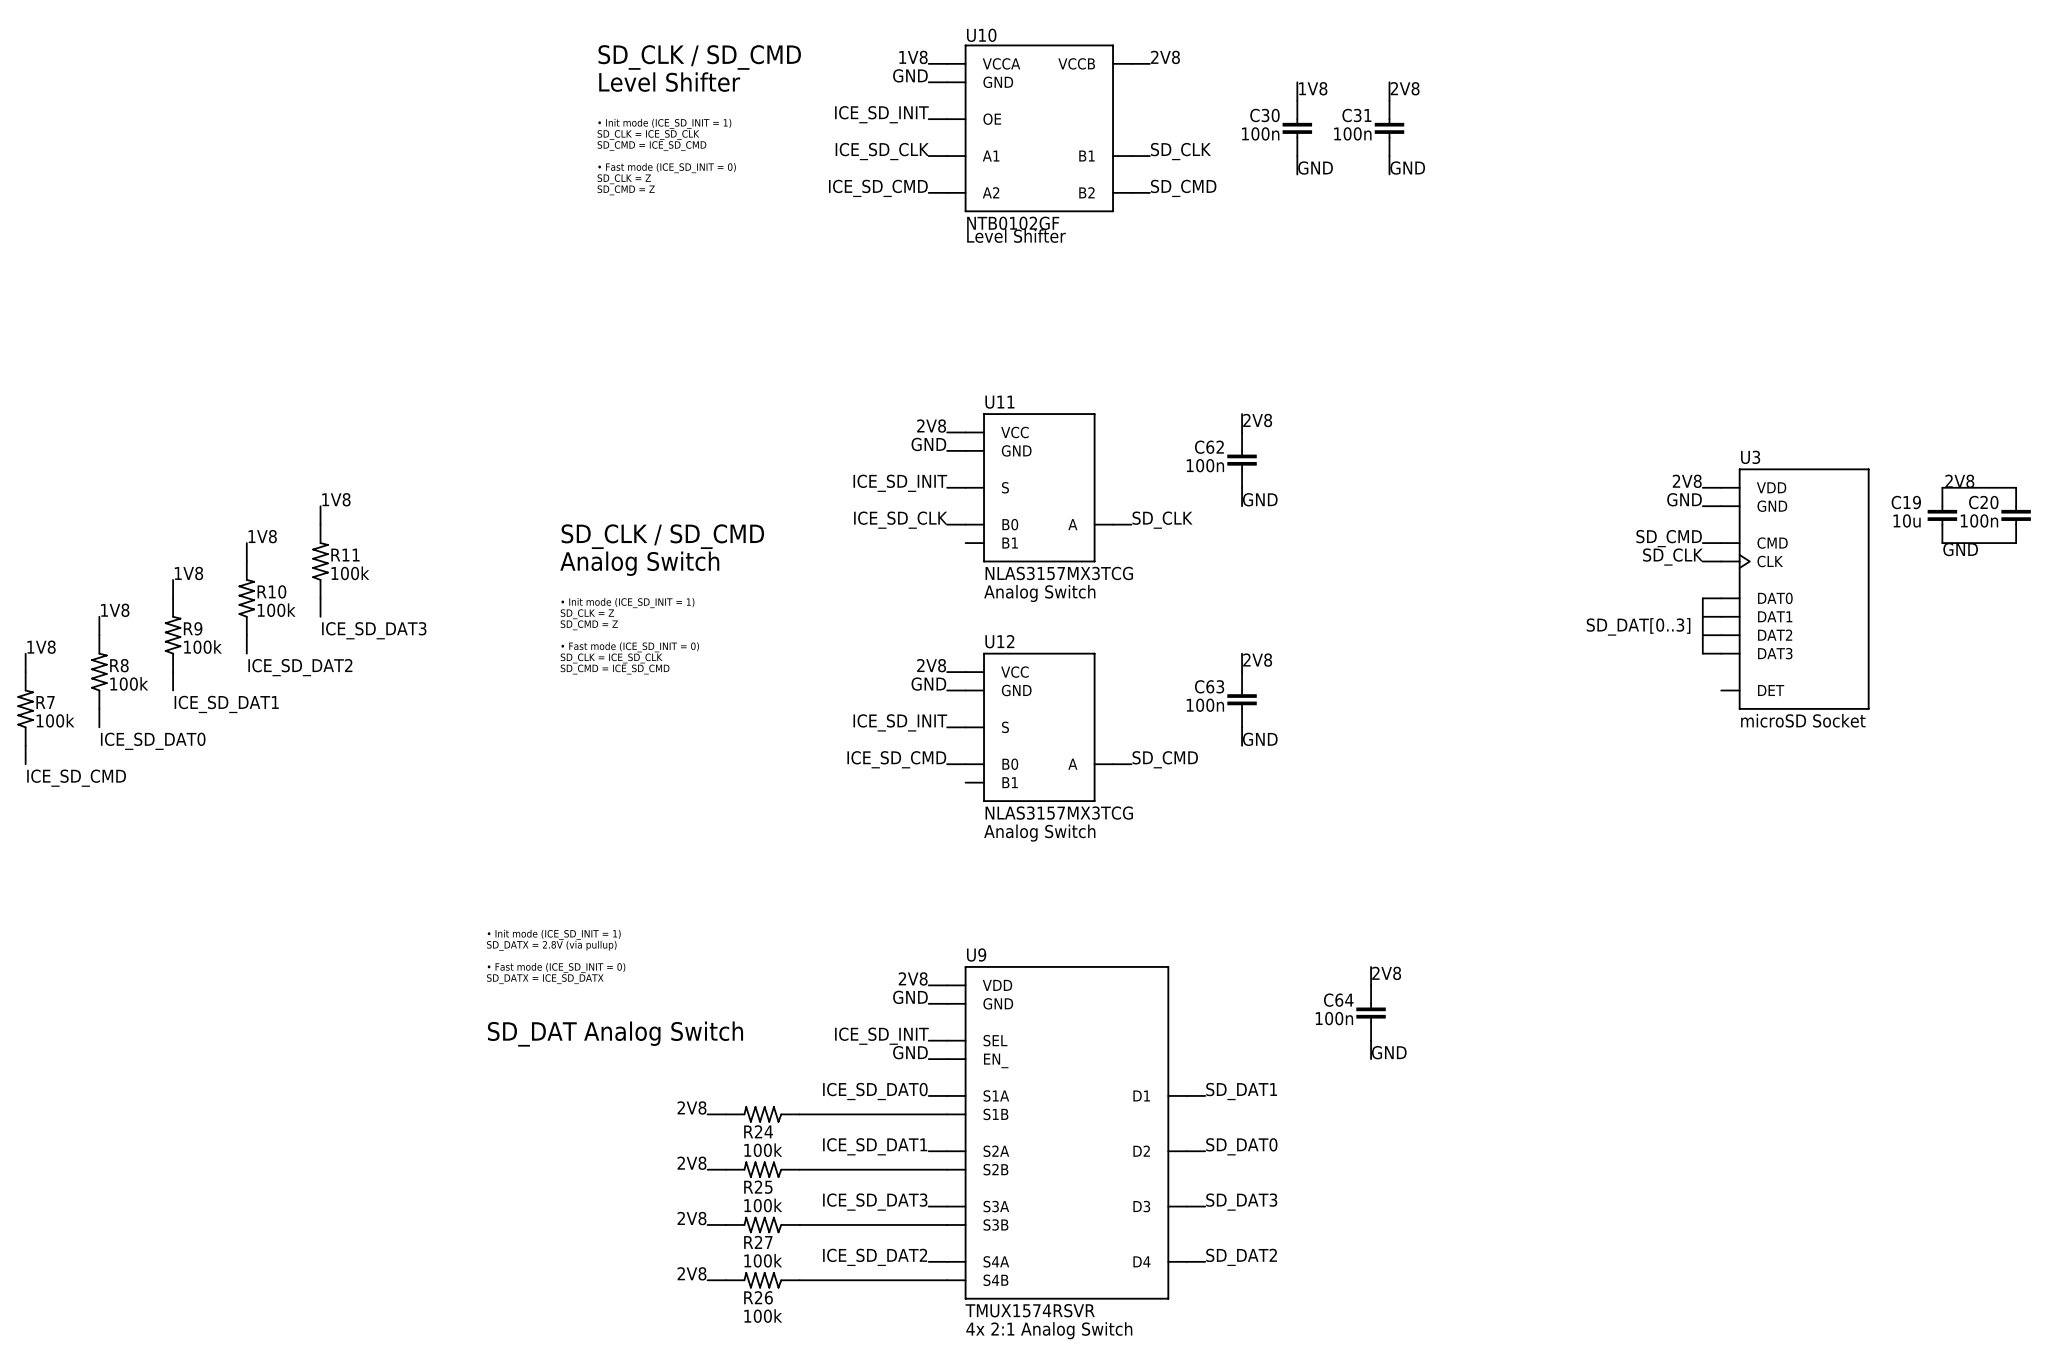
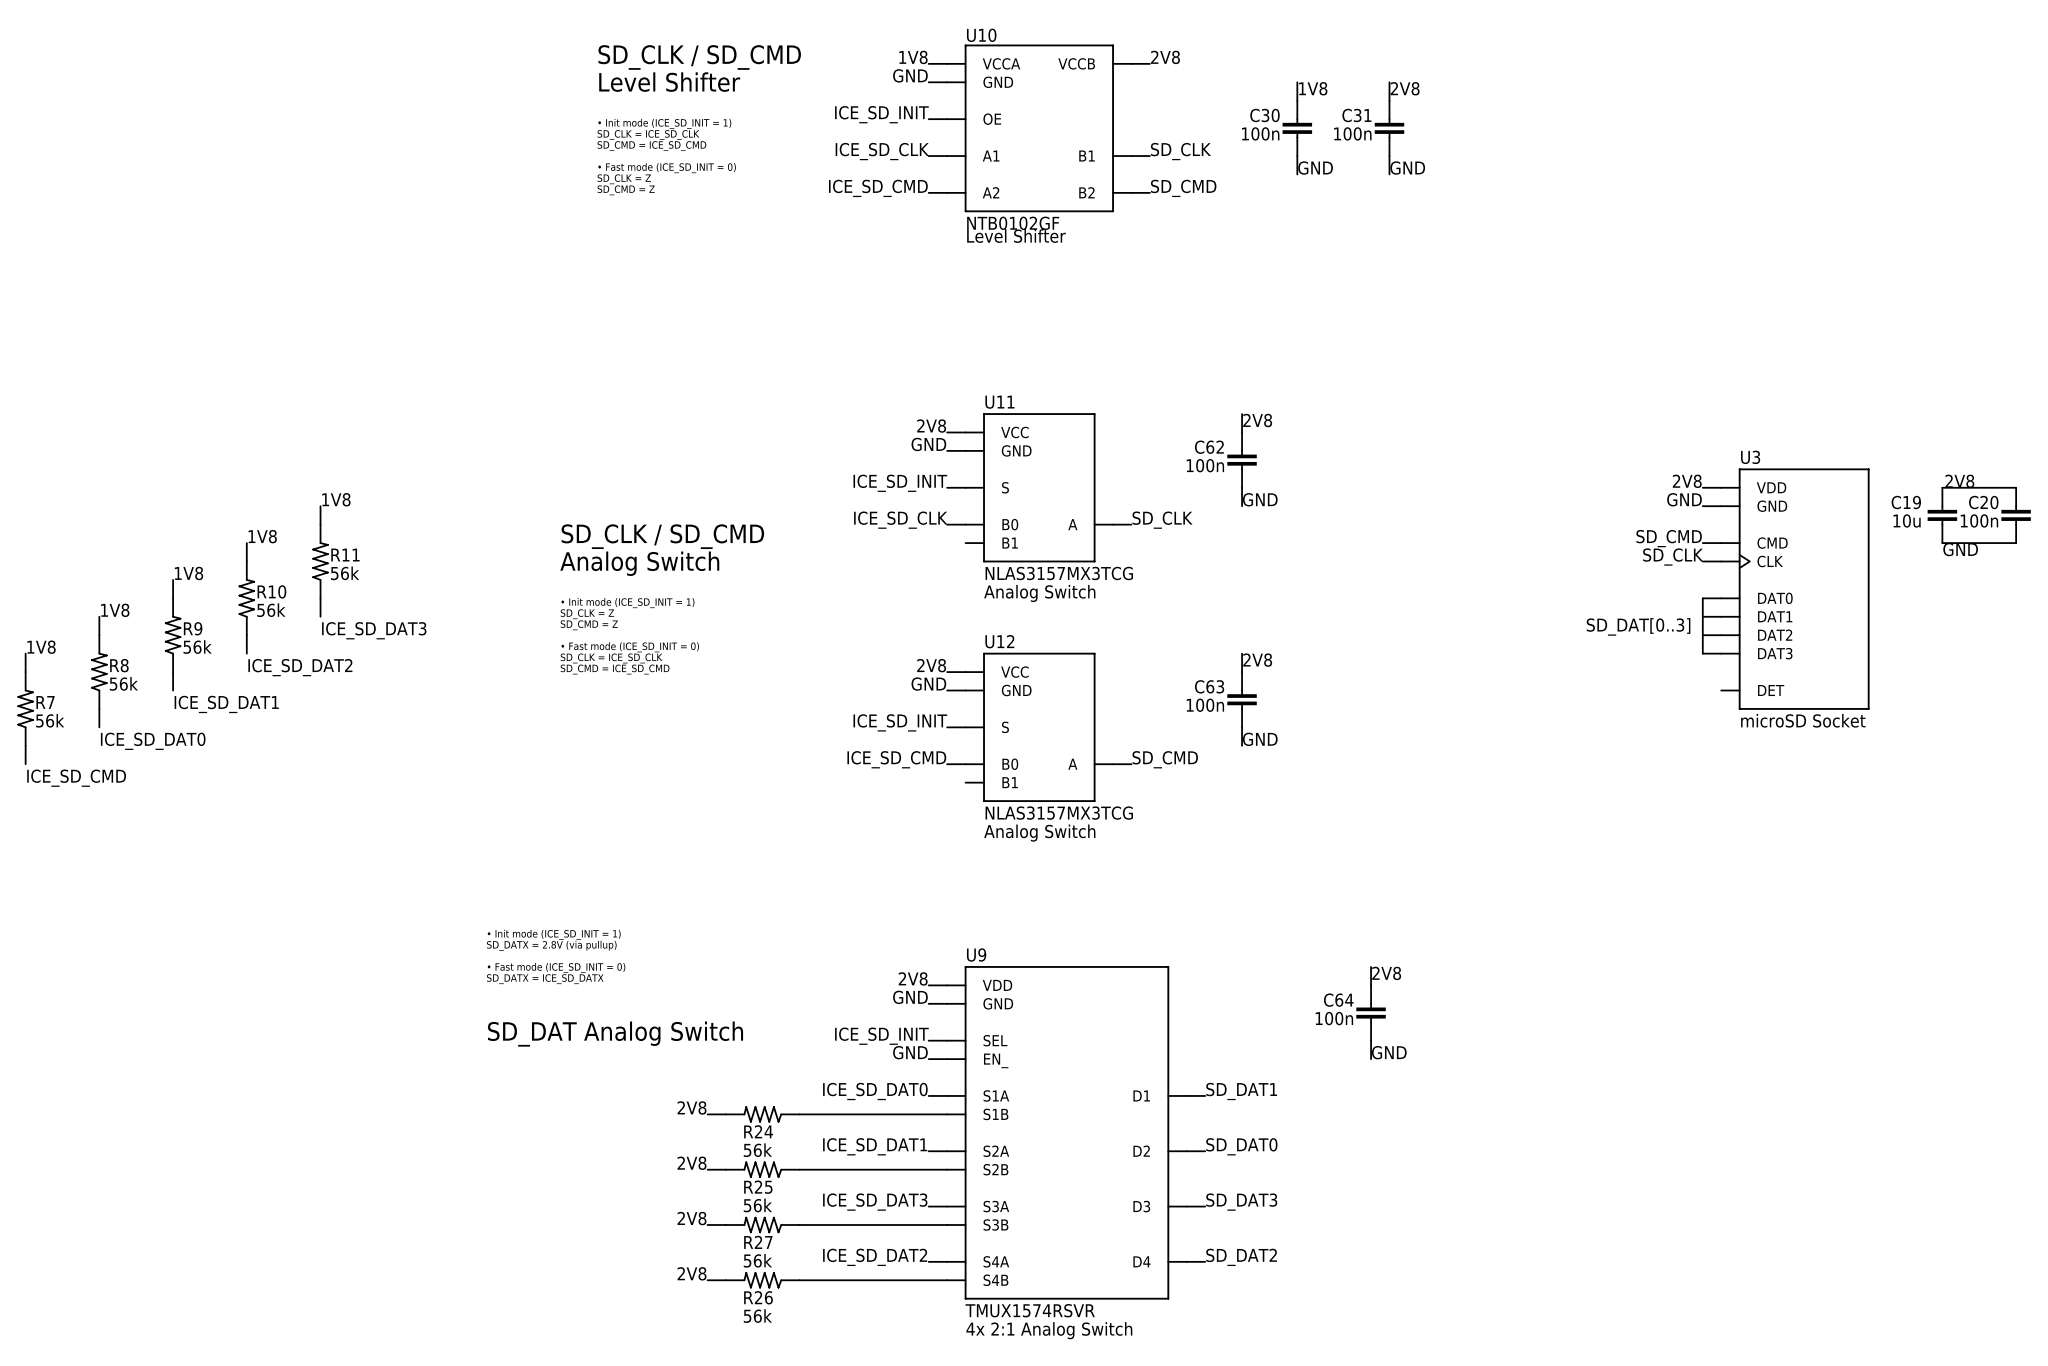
R11 value: 100k (350, 573) -> 56k (345, 573)
R10 value: 100k (276, 610) -> 56k (271, 610)
R9 value: 100k (202, 647) -> 56k (197, 647)
R8 value: 100k (129, 683) -> 56k (123, 683)
R7 value: 100k (55, 720) -> 56k (50, 720)
R24 value: 100k (763, 1150) -> 56k (757, 1150)
R25 value: 100k (763, 1205) -> 56k (757, 1205)
R27 value: 100k (763, 1260) -> 56k (757, 1260)
R26 value: 100k (763, 1316) -> 56k (757, 1316)

